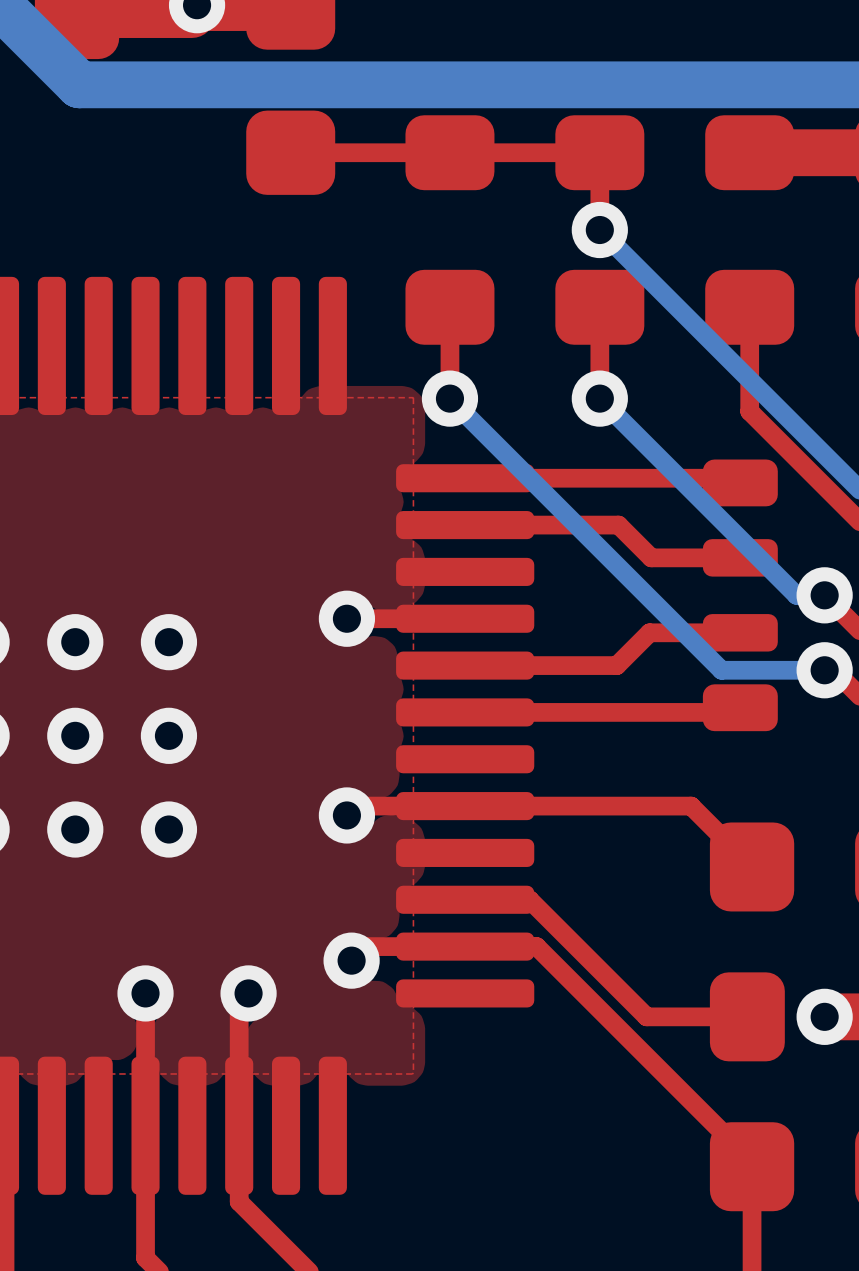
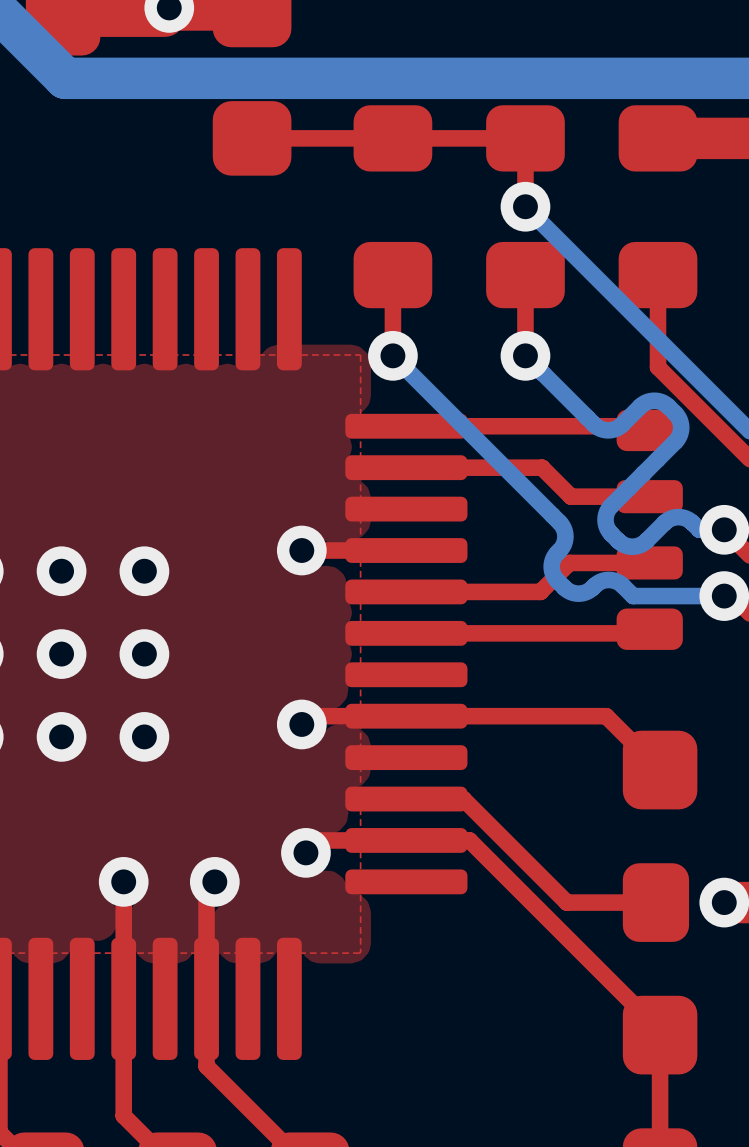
bottom track: (677, 476) (788, 587) -> (594, 424) (603, 429) (614, 429) (641, 405) (654, 400) (666, 405) (677, 415) (680, 422) (680, 432) (677, 439) (607, 511) (606, 526) (618, 540) (627, 546) (640, 545) (666, 521) (673, 517) (683, 517) (692, 522)
bottom track: (638, 587) (709, 658) -> (559, 522) (564, 529) (565, 538) (562, 547) (553, 558) (551, 568) (554, 577) (564, 587) (570, 592) (581, 593) (588, 591) (601, 581) (608, 579) (616, 581) (622, 585)

